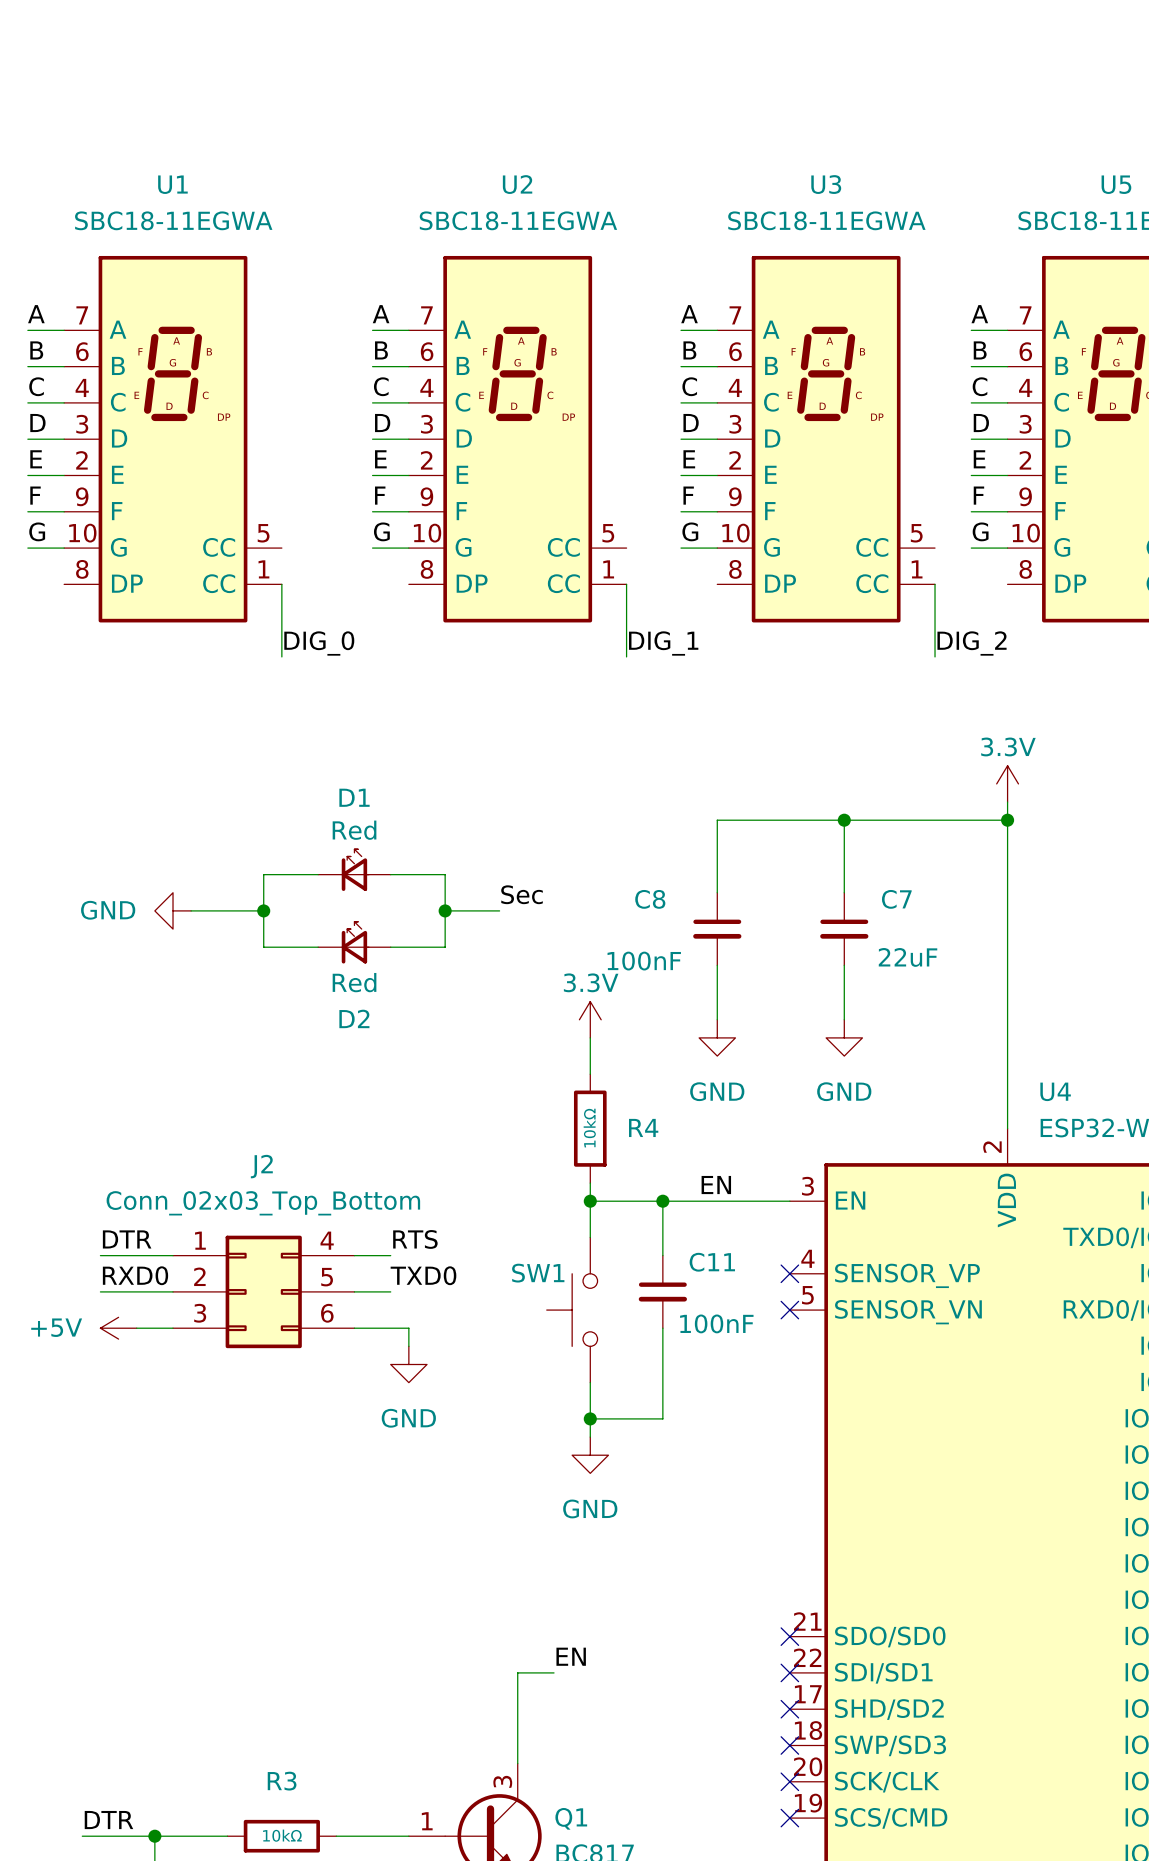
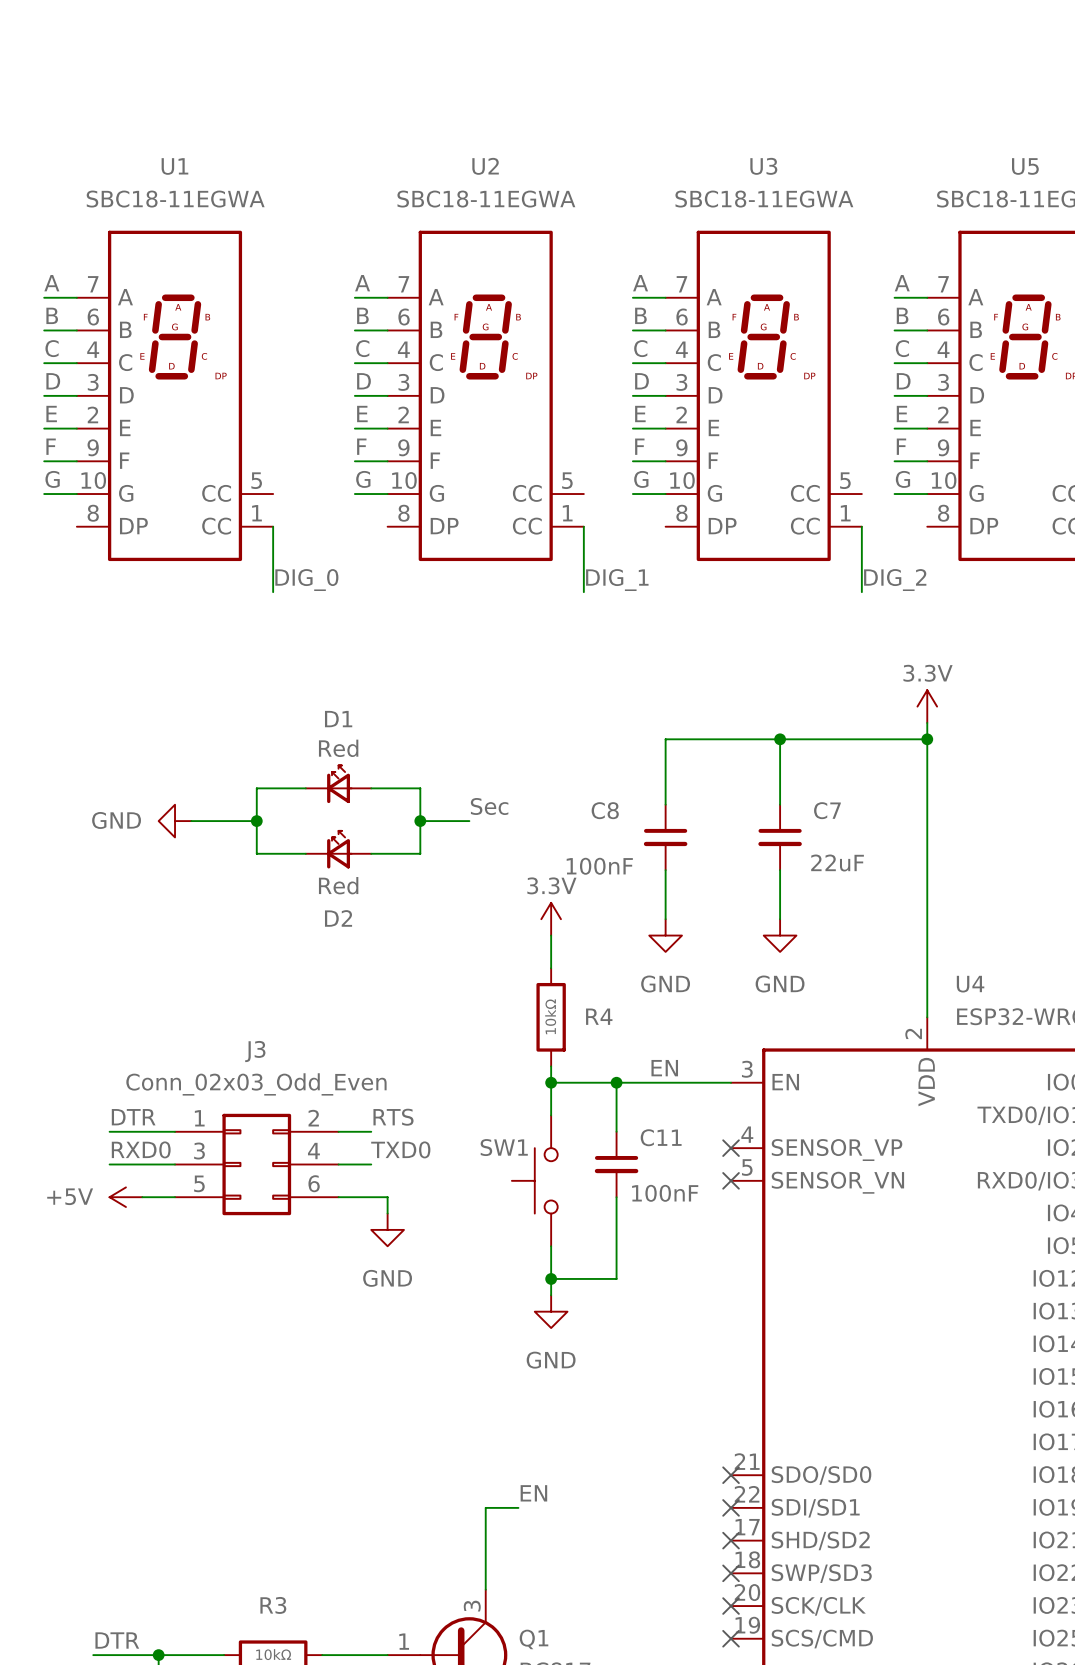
J2 name: J2 (261, 1166) -> J3 (255, 1051)
J2 value: Conn_02x03_Top_Bottom (263, 1203) -> Conn_02x03_Odd_Even (256, 1084)
J2 pin number: 4 (327, 1240) -> 2 (313, 1118)
J2 pin number: 2 (199, 1276) -> 3 (199, 1151)
J2 pin number: 5 (327, 1277) -> 4 (313, 1151)
J2 pin number: 3 (200, 1313) -> 5 (199, 1183)

